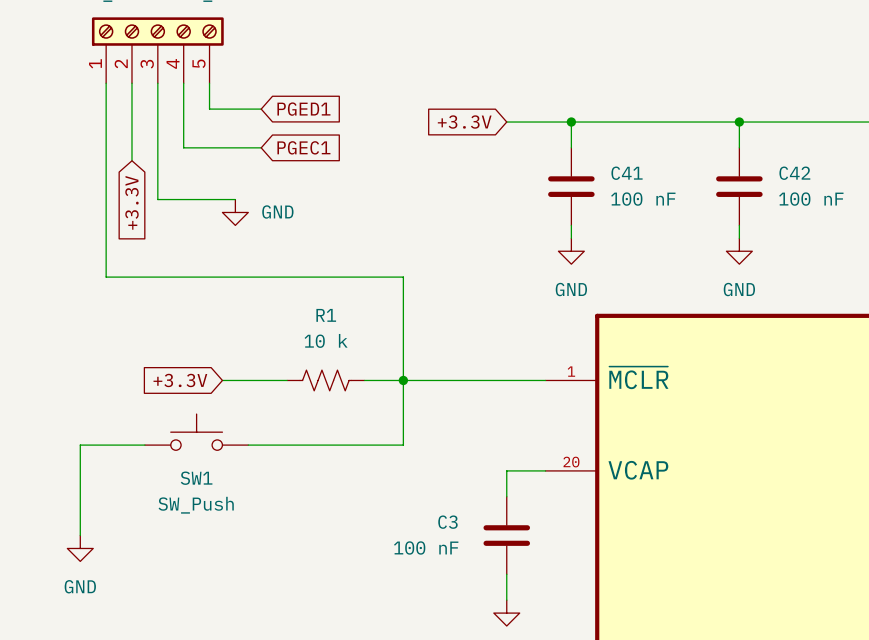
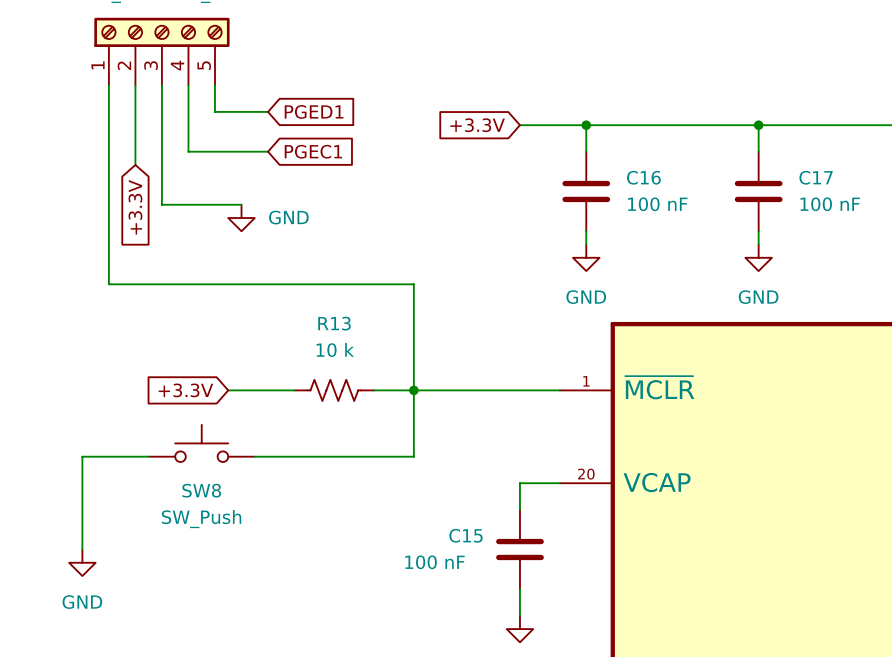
C41 name: C41 (627, 173) -> C16 (643, 177)
C42 name: C42 (794, 173) -> C17 (816, 177)
R1 name: R1 (326, 315) -> R13 (334, 323)
SW1 name: SW1 (196, 478) -> SW8 (201, 490)
C3 name: C3 (447, 522) -> C15 (466, 535)

